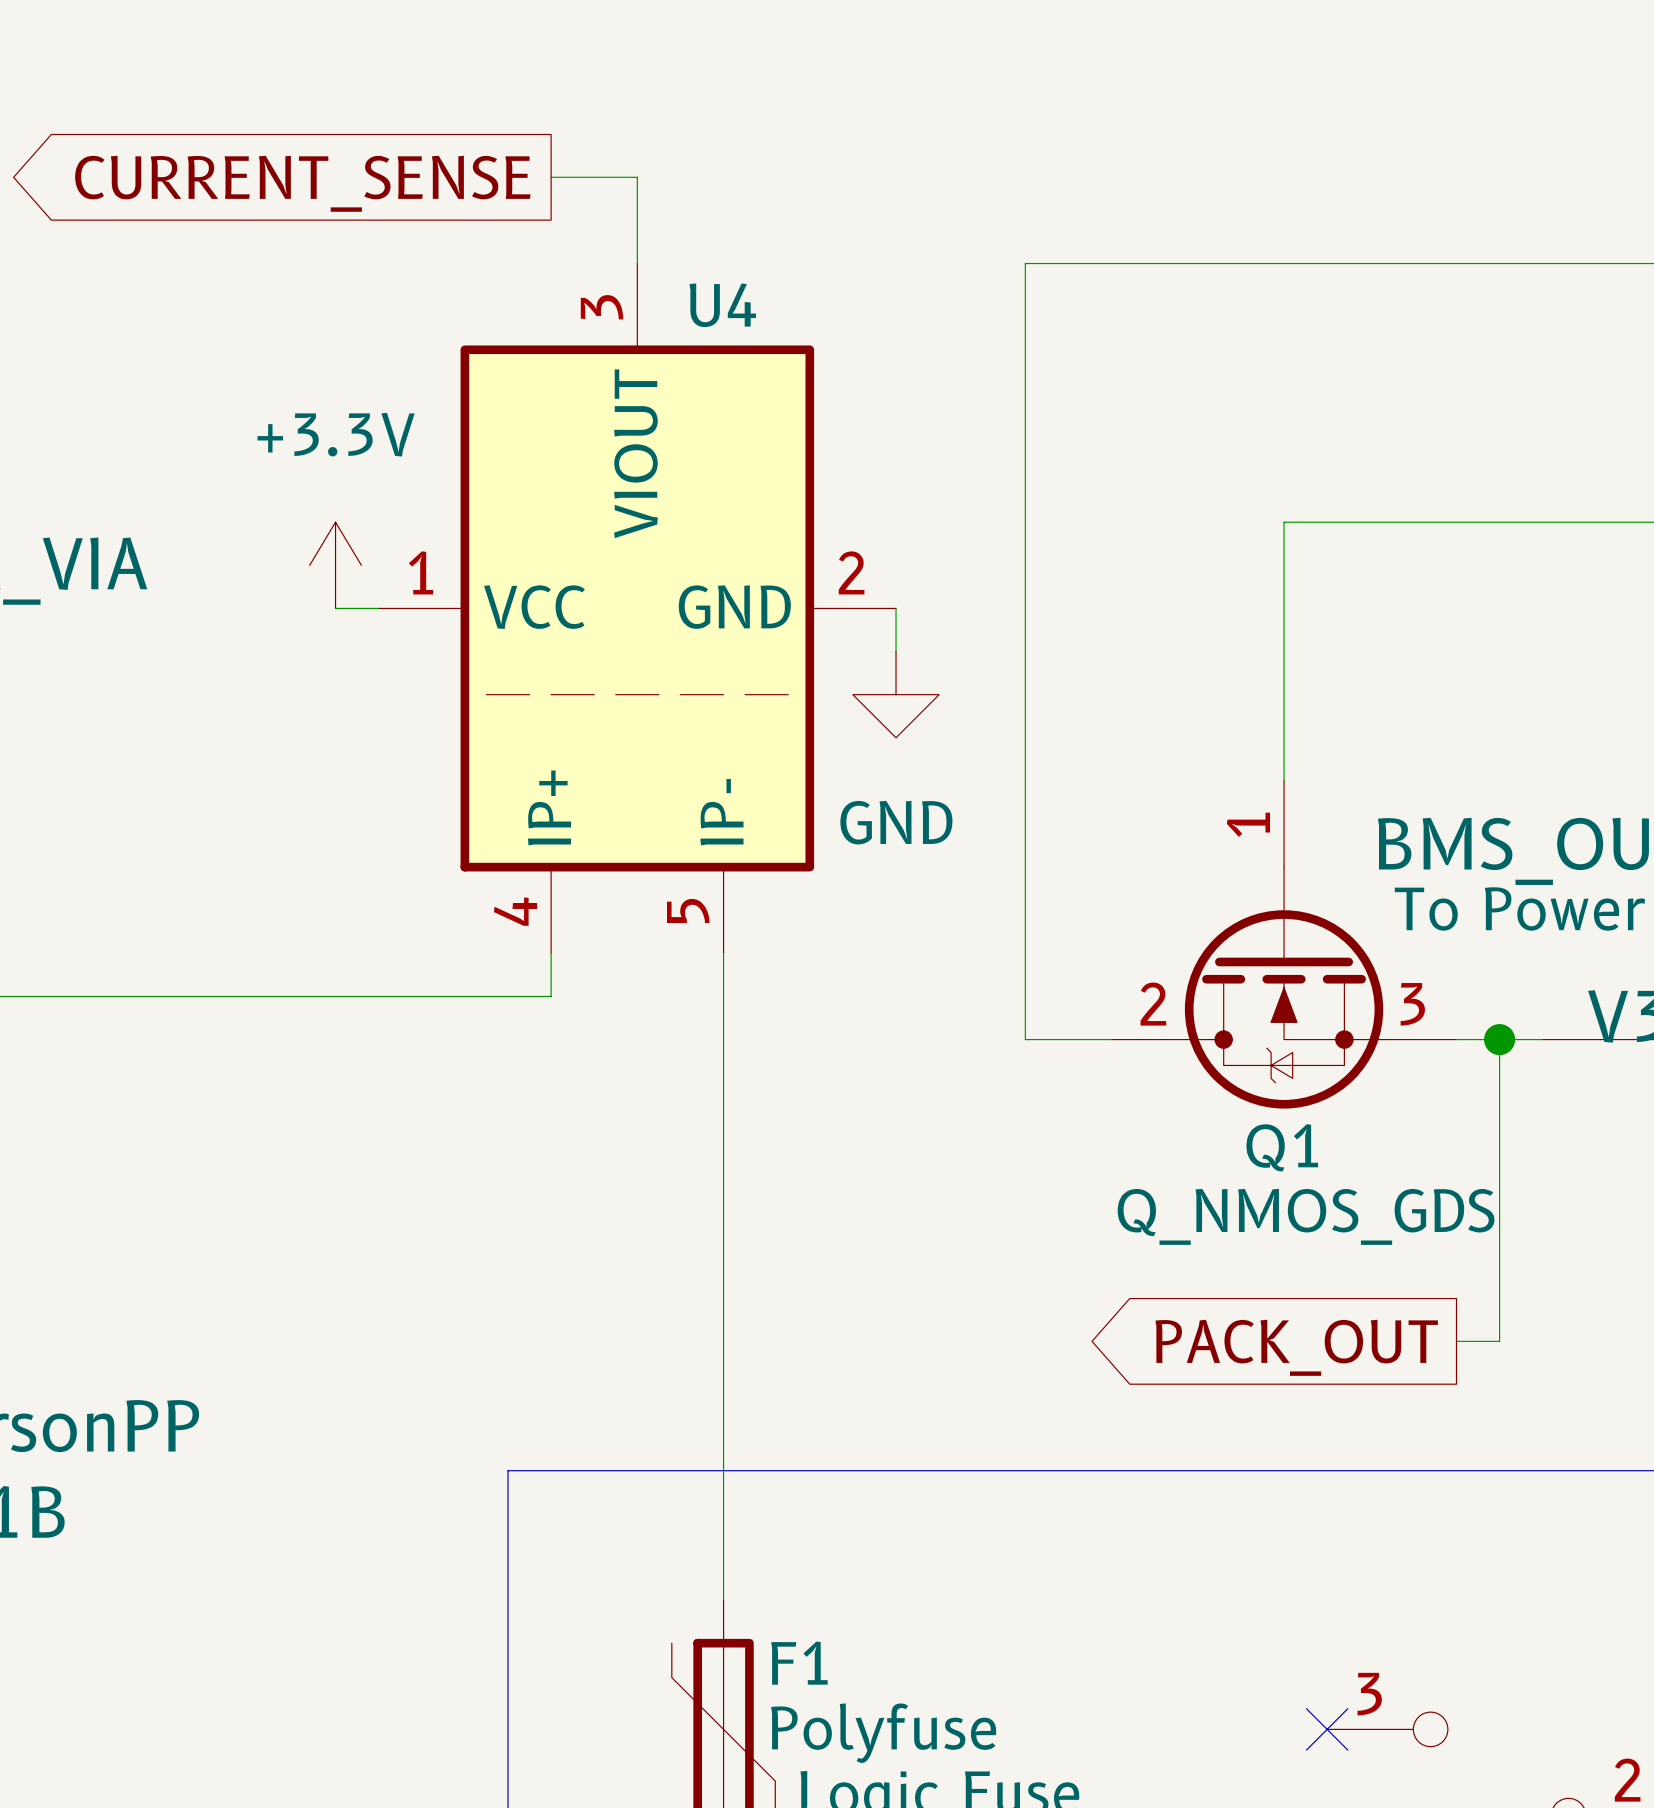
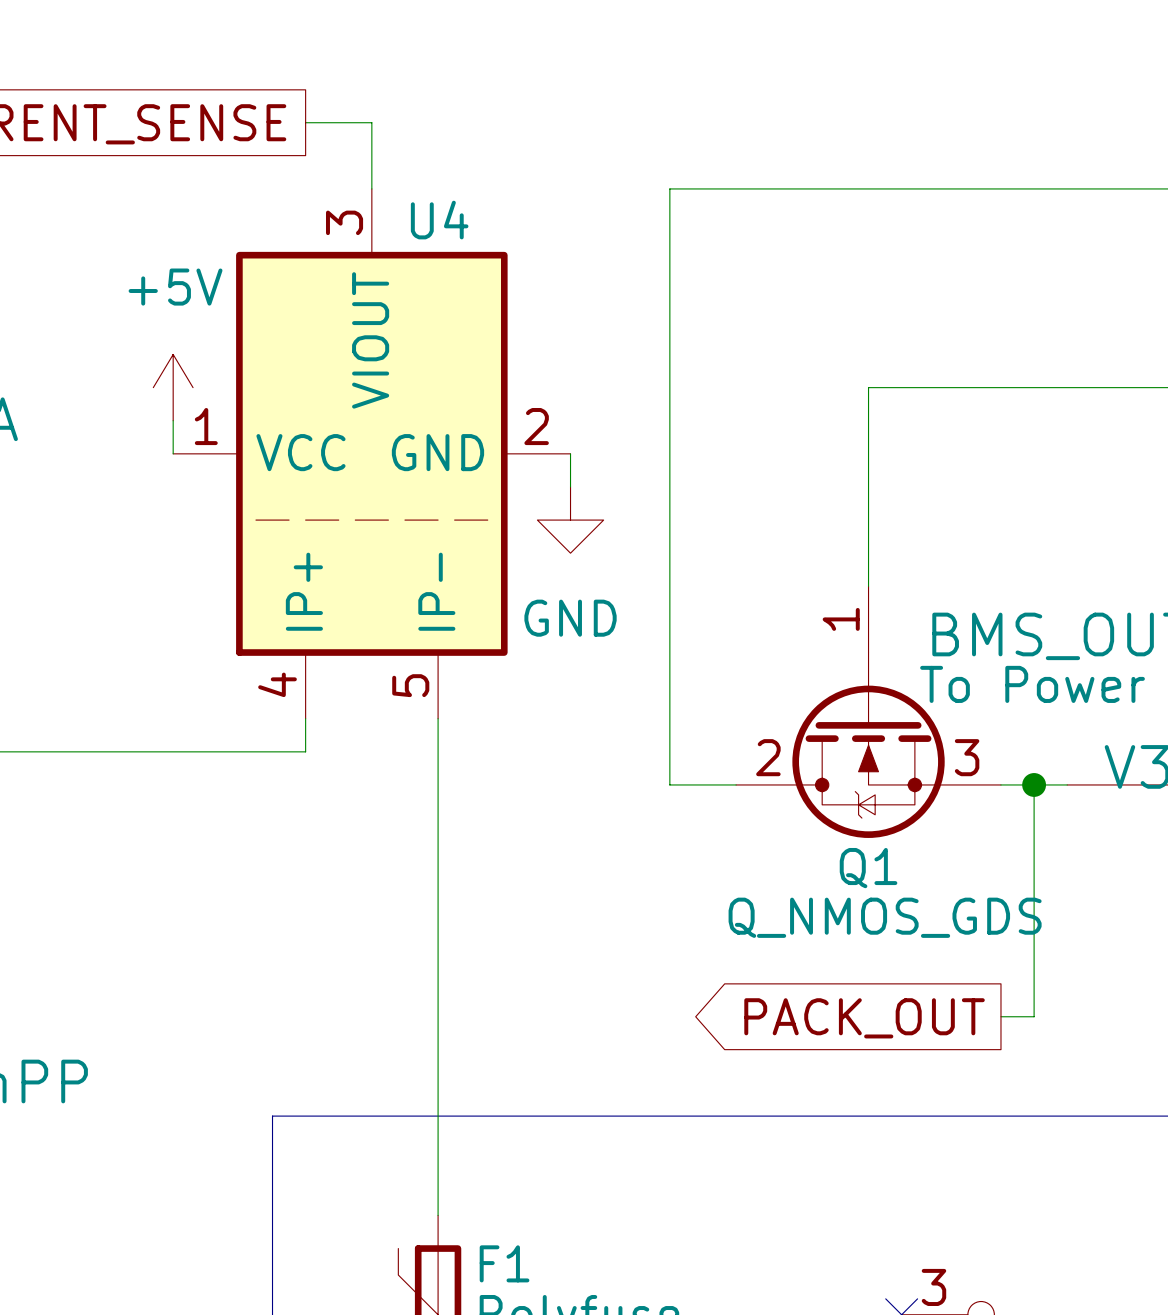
power symbol: none -> +5V (173, 387)
power symbol: +3.3V (335, 565) -> none
wire: (335, 608) (378, 608) -> (173, 420) (173, 453)

